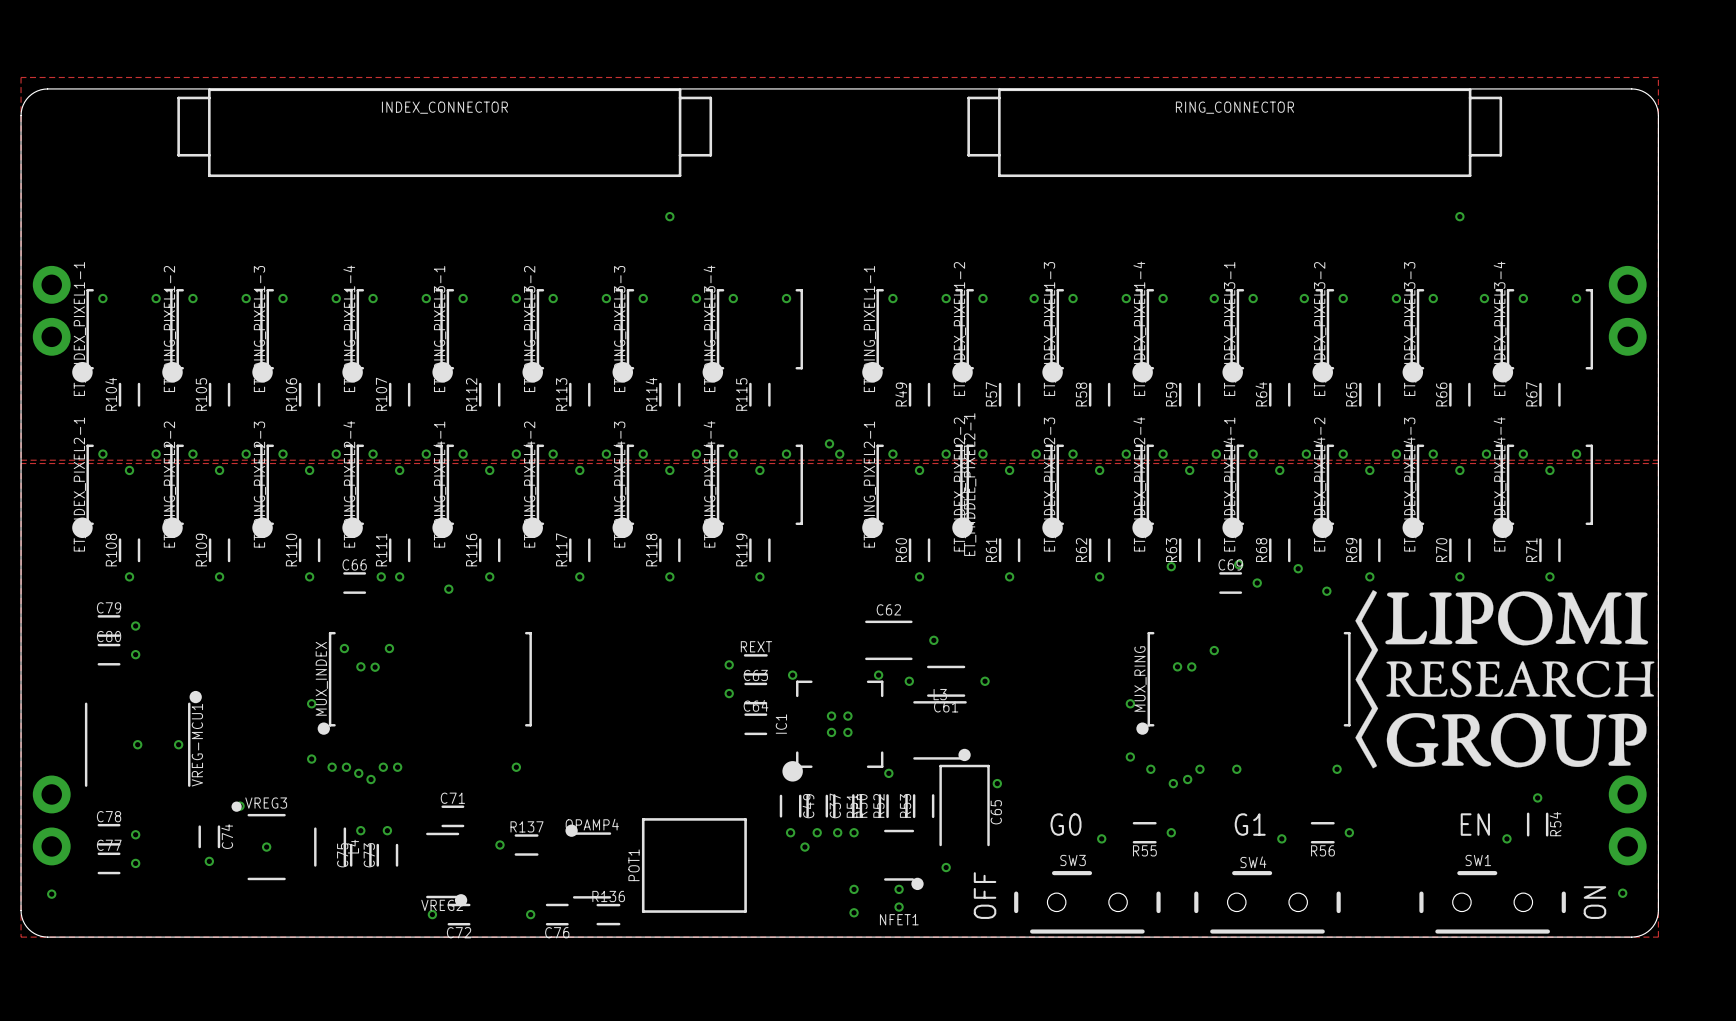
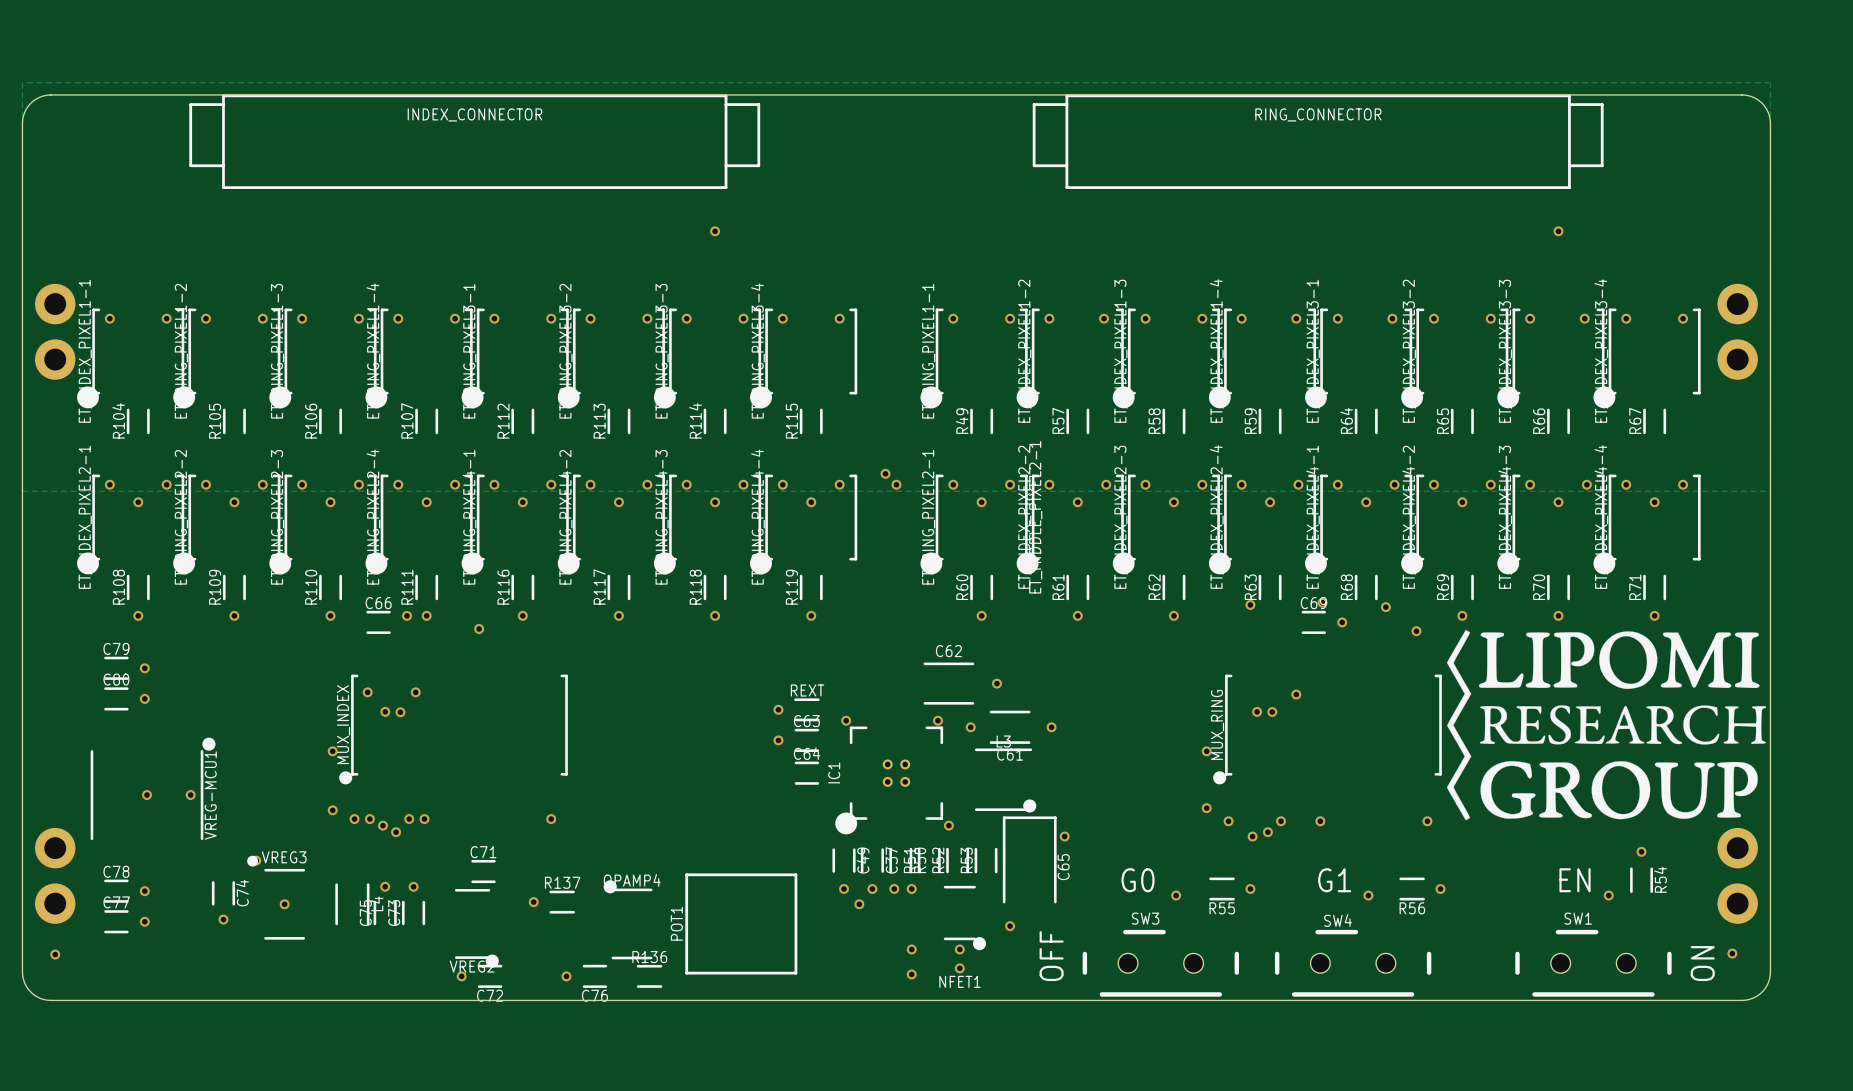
zone outline: (21, 463) (21, 937) (1658, 937) (1658, 463) (21, 463) -> none

